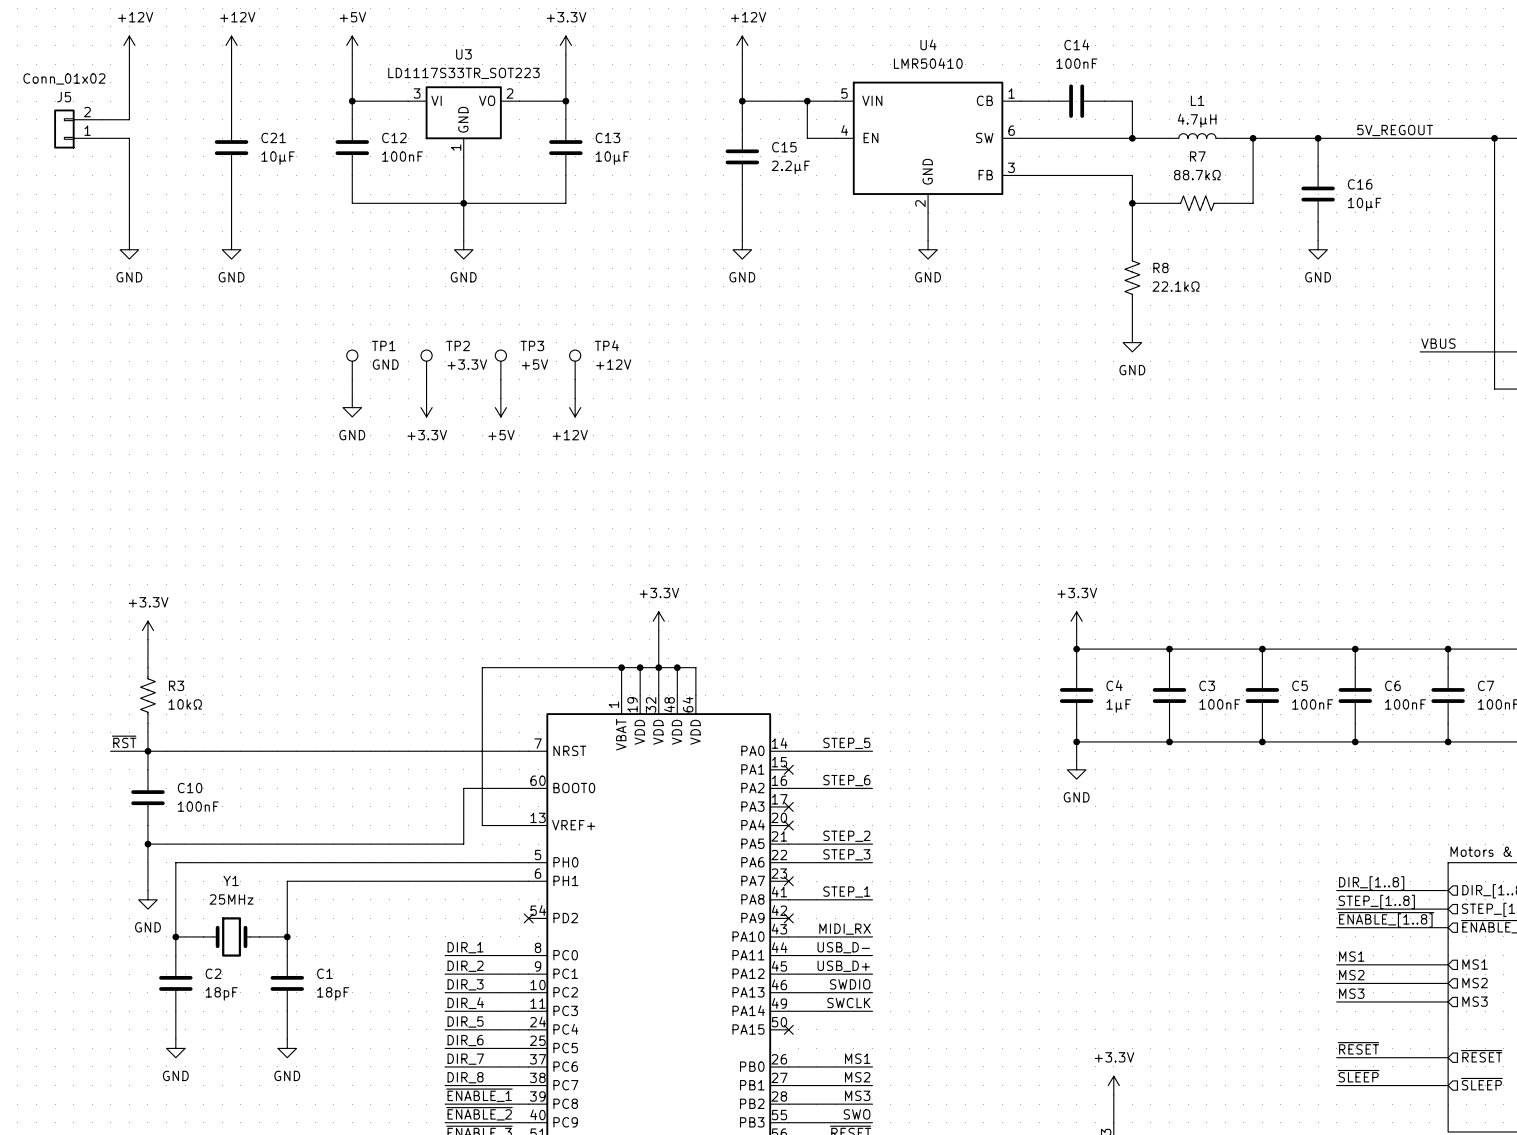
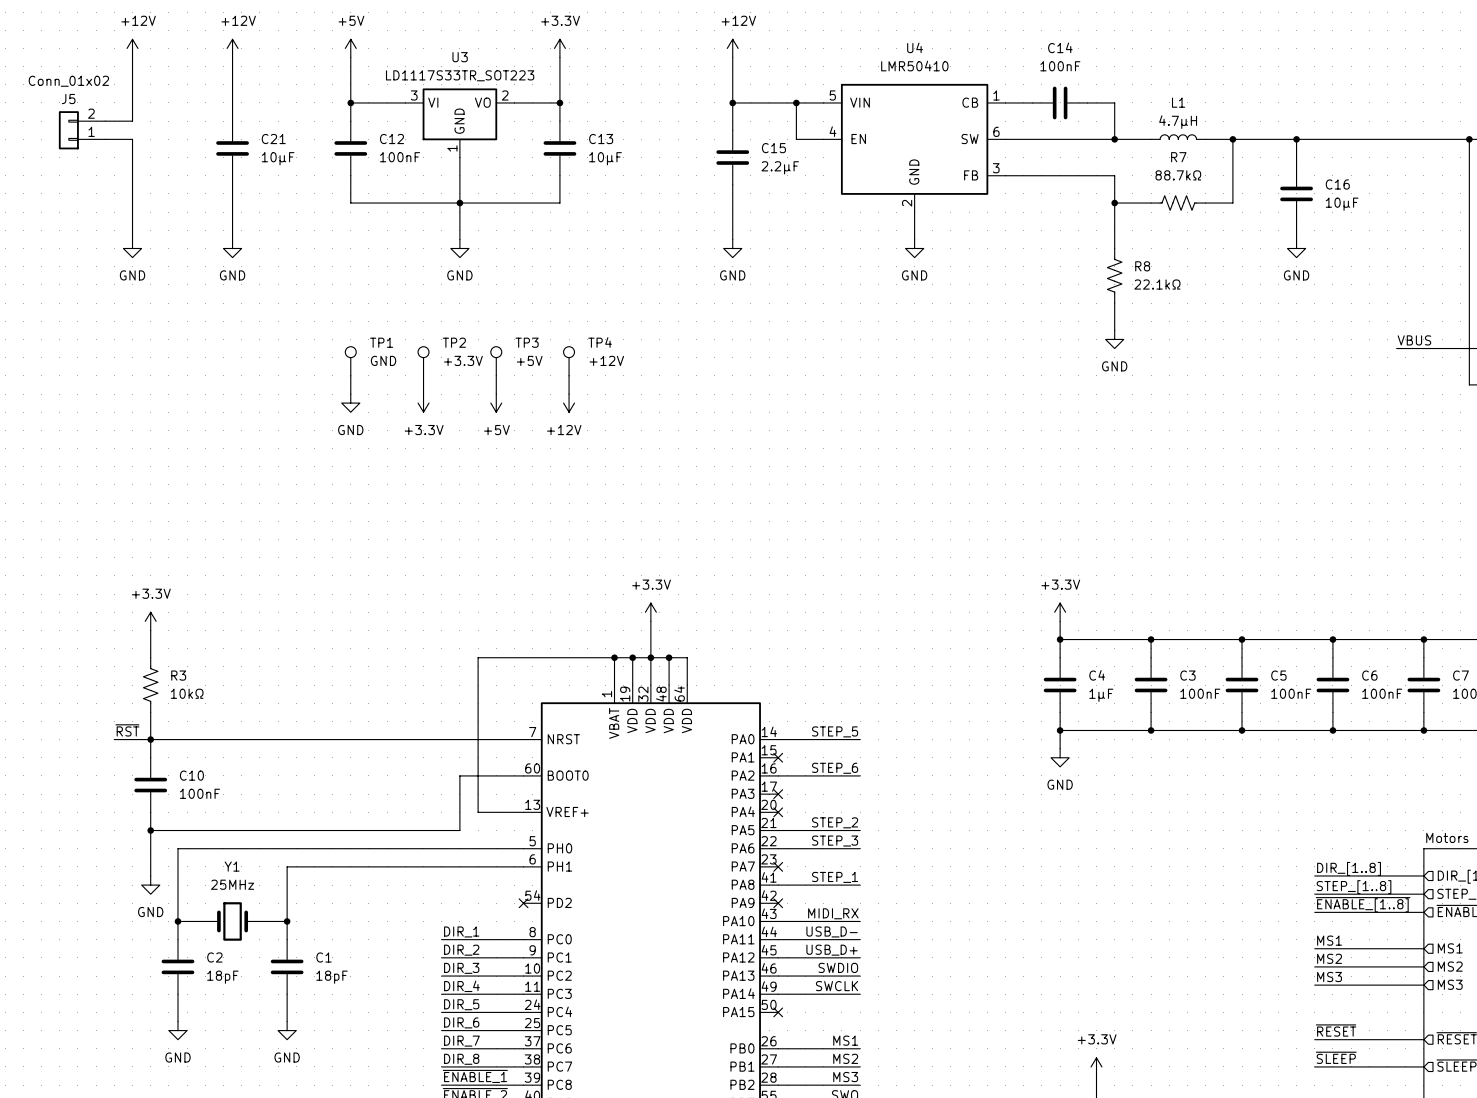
label: 5V_REGOUT (1395, 130) -> none

